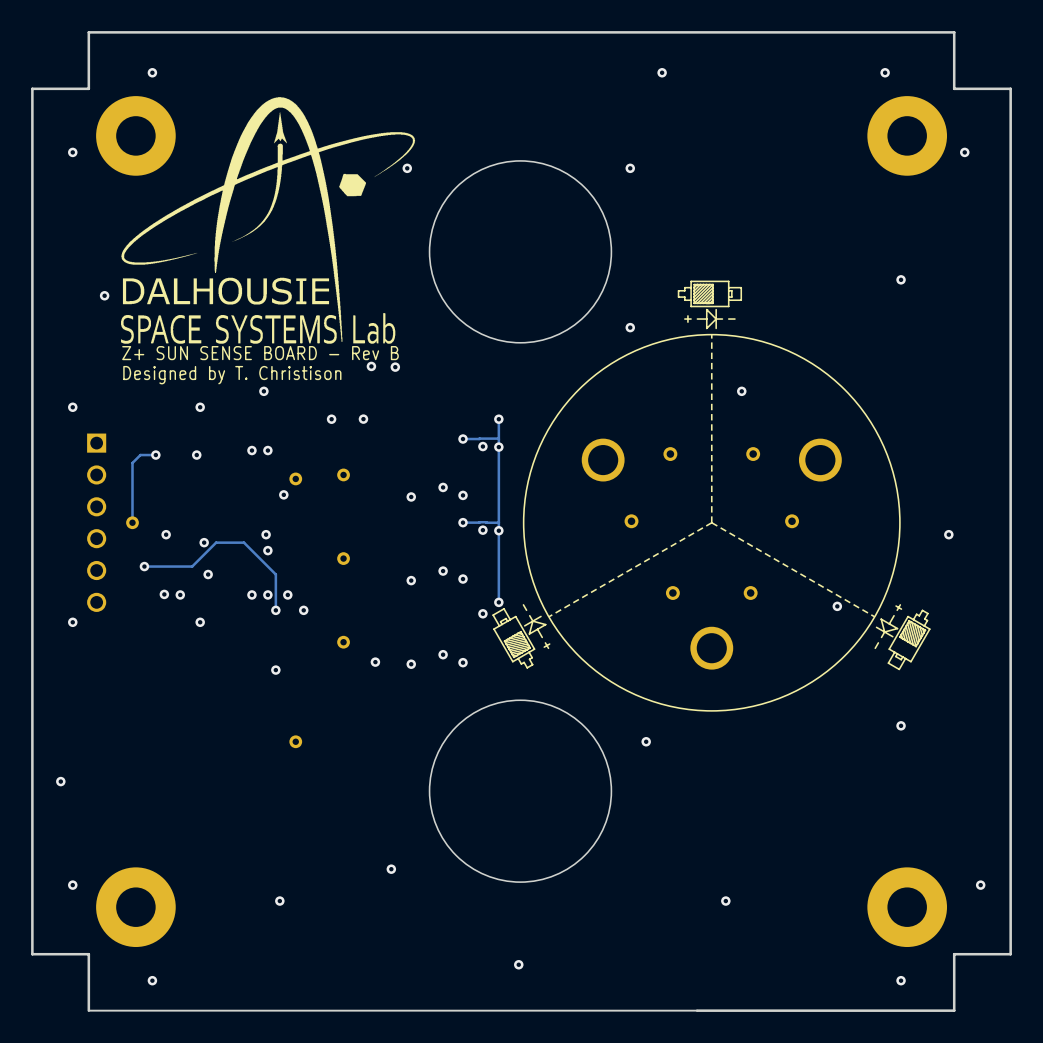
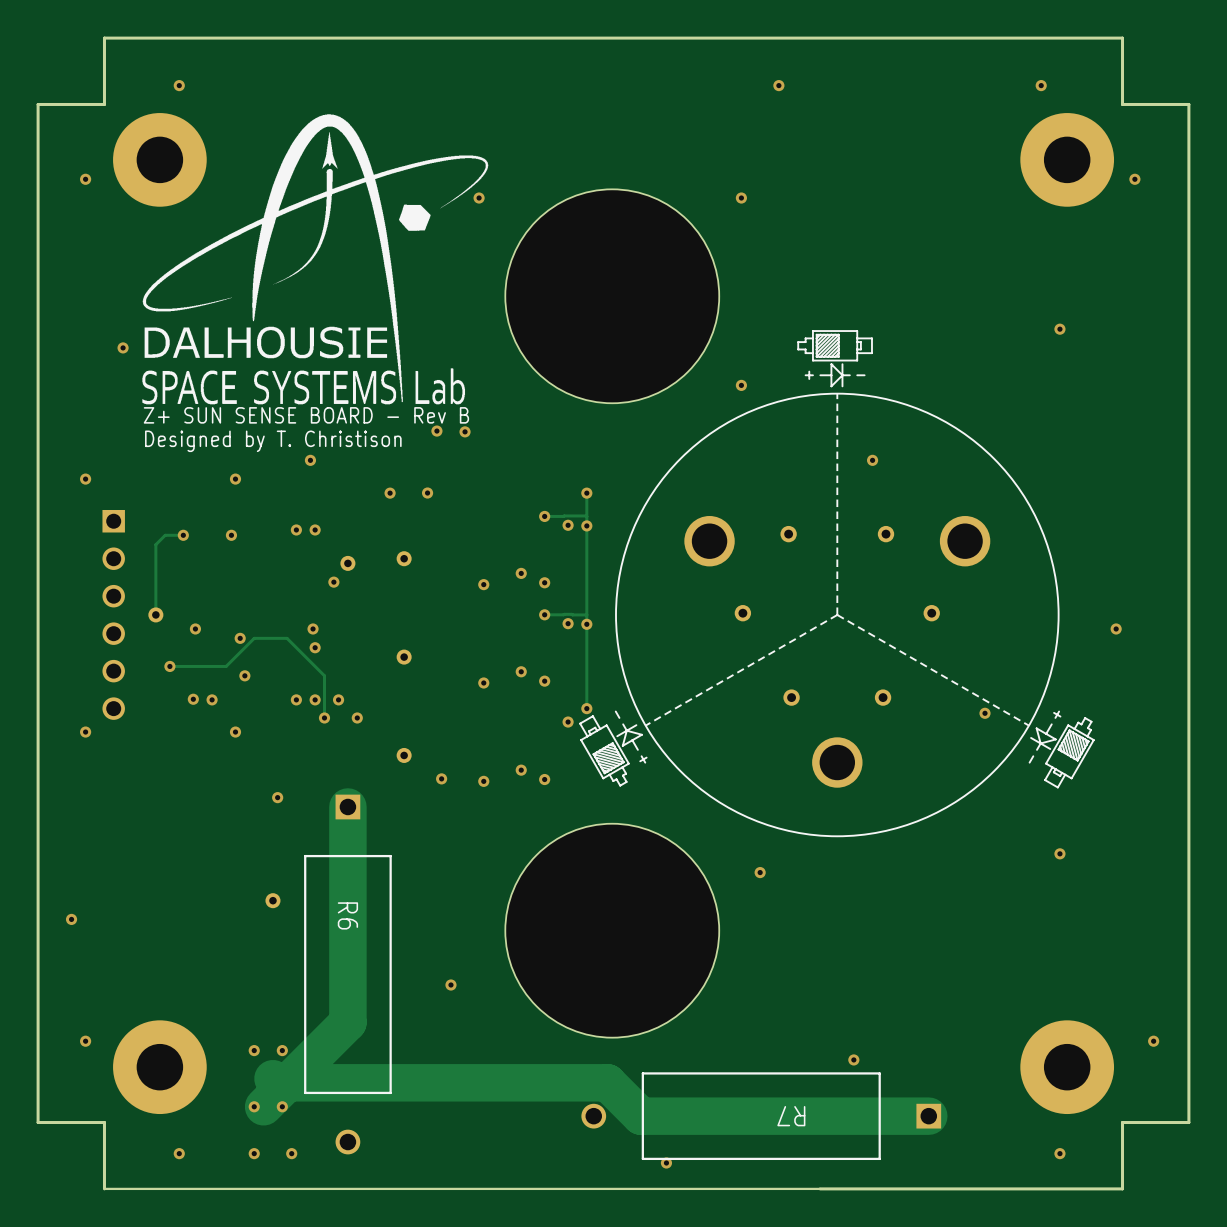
via position: (275, 670) -> (277, 797)
track: none -> (347, 806) (347, 1022) (263, 1106)
part position: (295, 741) -> (272, 900)
R6: none -> (347, 974)
via position: (391, 869) -> (450, 985)
via: none -> (254, 1050)
via: none -> (282, 1050)
via: (279, 901) -> none
track: none -> (272, 1078) (277, 1082) (607, 1082) (640, 1116) (928, 1116)
via: none -> (254, 1106)
via: none -> (282, 1106)
R7: none -> (761, 1116)
via position: (518, 964) -> (666, 1163)
via: none -> (254, 1153)
via: none -> (291, 1153)

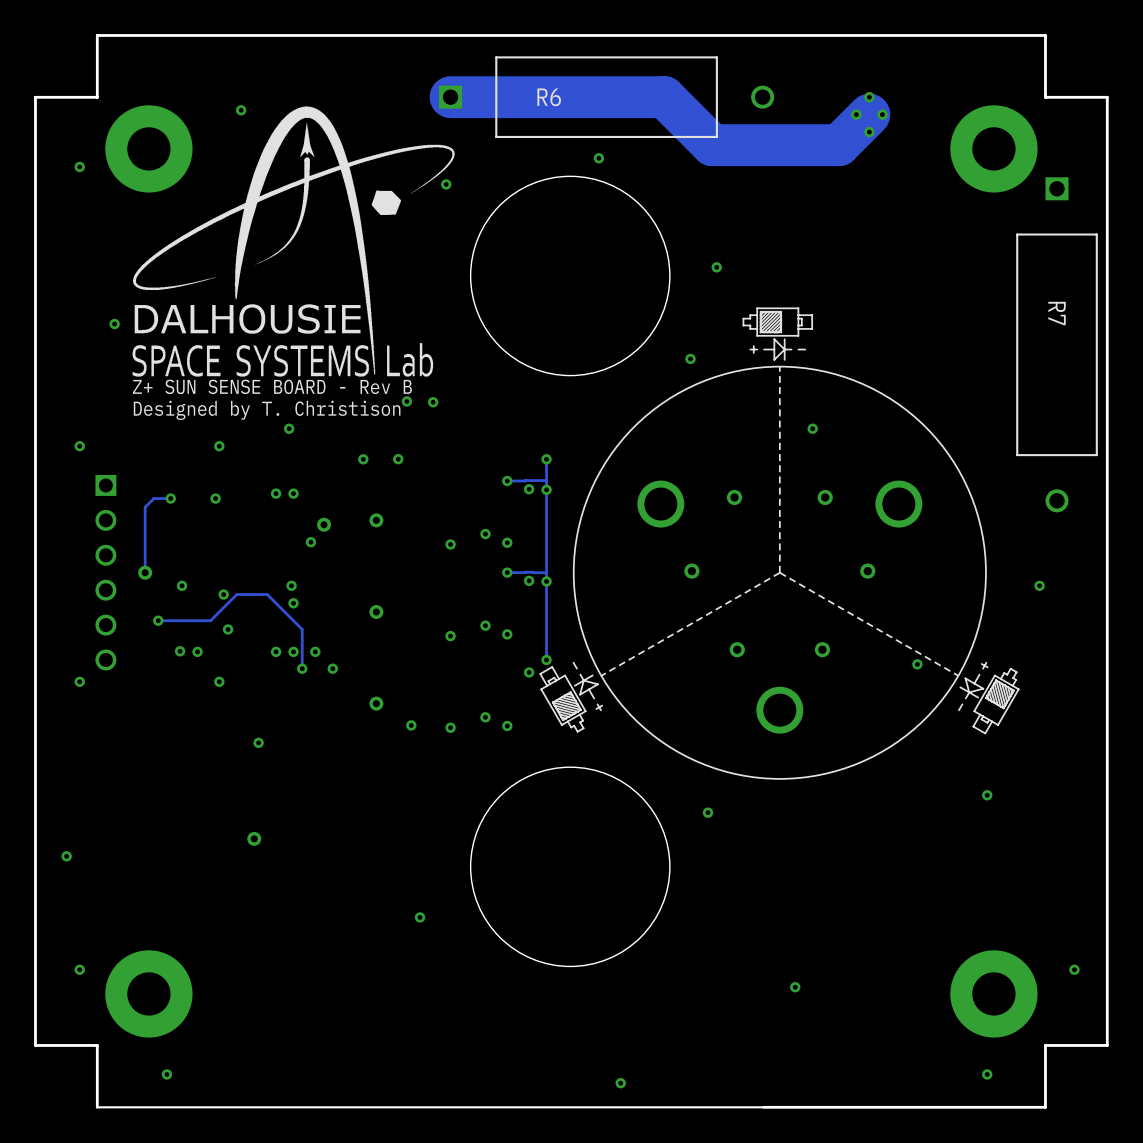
via position: (179, 85) -> (241, 110)
via: (778, 85) -> none
via: (1041, 85) -> none
track: none -> (450, 97) (664, 97) (712, 145) (838, 145) (869, 114)
via: none -> (869, 97)
via: none -> (856, 114)
via: none -> (882, 114)
via: none -> (869, 132)
via: none -> (598, 158)
via: (1134, 179) -> none
via: (741, 198) -> none
via: none -> (716, 267)
via: (1059, 329) -> none
track: (347, 806) (347, 1022) (263, 1106) -> none
R6 rotation: 0° (347, 974) -> 90° counterclockwise (606, 97)
R6 position: (347, 974) -> (606, 97)
via: (254, 1050) -> none
via: (282, 1050) -> none
track: (272, 1078) (277, 1082) (607, 1082) (640, 1116) (928, 1116) -> none
via: (254, 1106) -> none
via: (282, 1106) -> none
R7 rotation: 0° (761, 1116) -> 90° counterclockwise (1057, 344)
R7 position: (761, 1116) -> (1057, 344)
via: (254, 1153) -> none
via: (291, 1153) -> none

